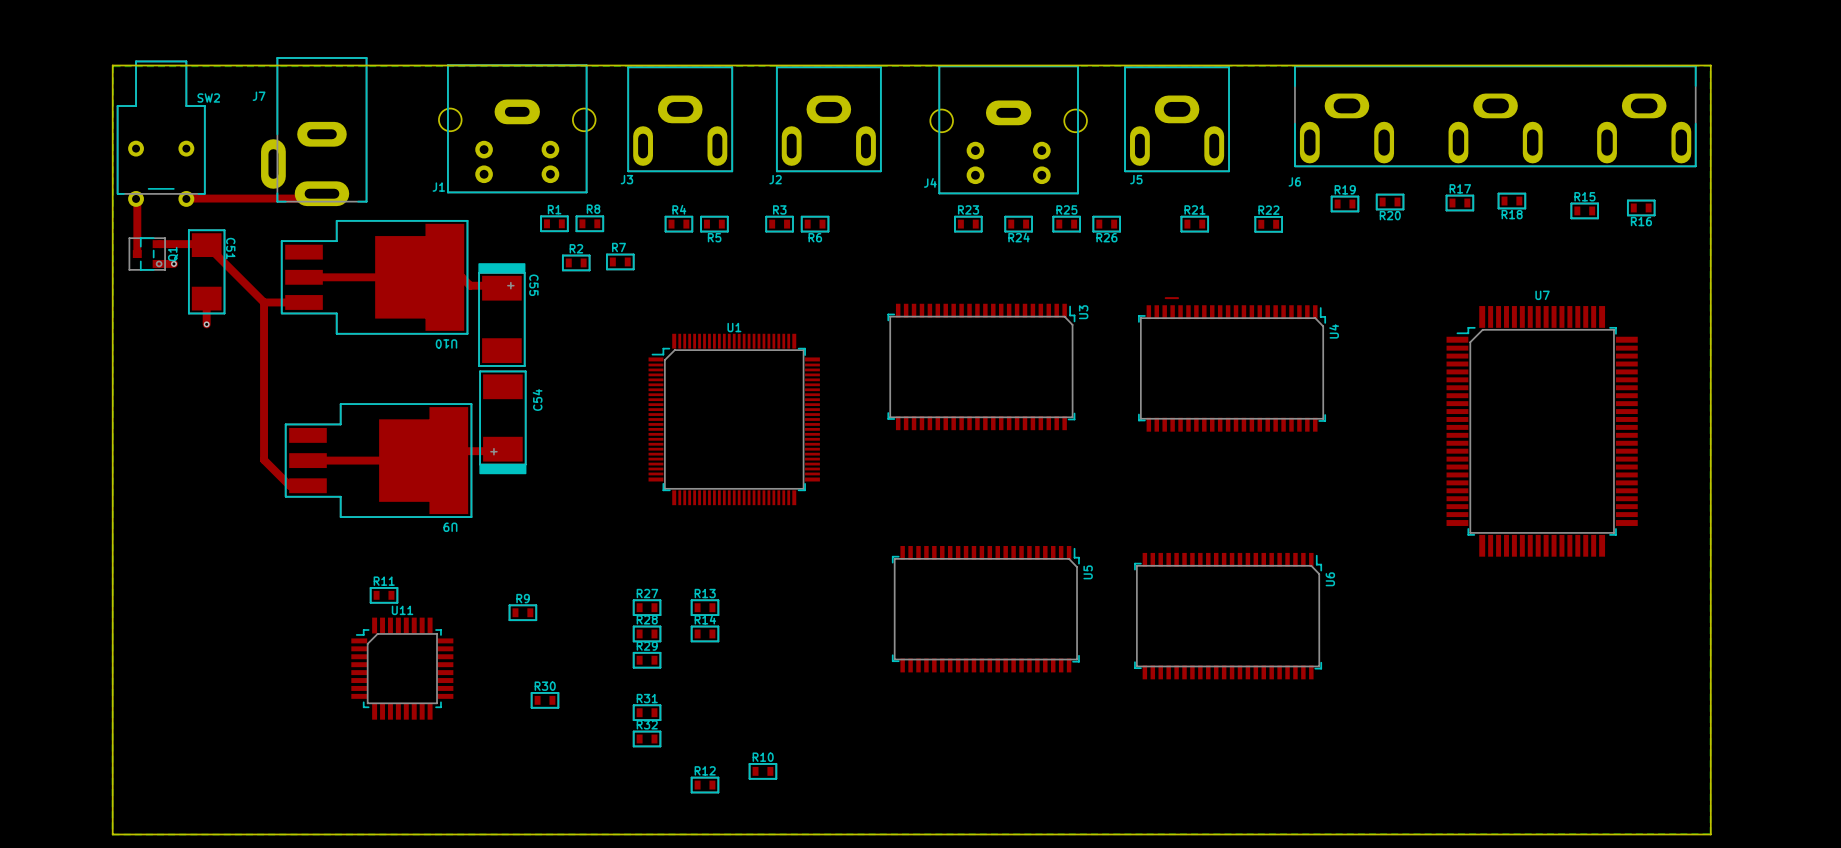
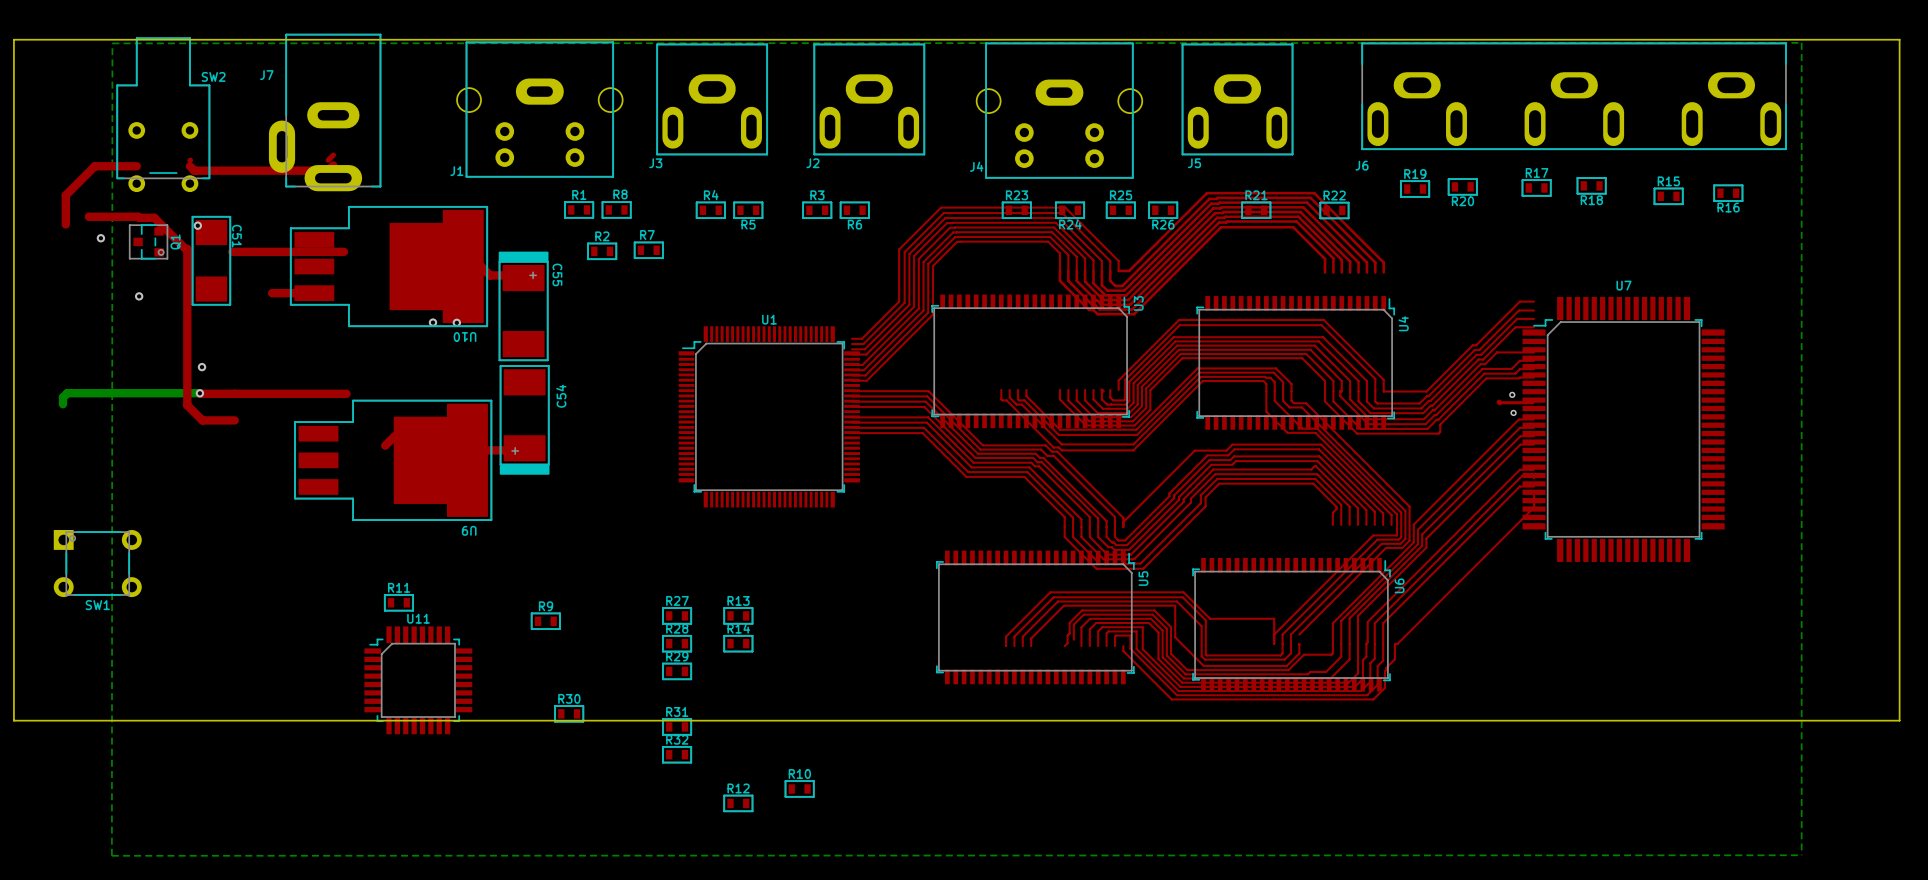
board edge: (112, 65) (1710, 65) (1710, 834) (112, 834) (112, 65) -> (13, 39) (13, 720) (1899, 720) (1899, 39) (13, 39)
top track: none -> (333, 155) (328, 160)
top track: none -> (190, 160) (189, 160)
top track: none -> (333, 165) (328, 170) (194, 170) (189, 166)
top track: none -> (136, 166) (94, 166) (65, 195) (65, 224)
top track: (321, 193) (317, 198) (186, 198) -> none
top track: (136, 198) (137, 251) -> none
top track: none -> (88, 216) (154, 217) (185, 248)
via: none -> (197, 225)
top track: (159, 244) (205, 244) (264, 302) (264, 459) (289, 485) (307, 485) -> none
via: none -> (100, 238)
top track: none -> (187, 248) (187, 405) (202, 420) (234, 420)
top track: (157, 263) (173, 263) -> none
via: (173, 263) -> none
top track: (304, 277) (409, 277) -> (232, 251) (343, 251)
top track: none -> (1325, 272) (1325, 258) (1293, 227) (1221, 227) (1134, 314) (1097, 314) (1093, 309) (1089, 309) (1059, 280) (1059, 253) (1048, 241) (957, 241) (932, 265) (932, 314) (866, 380) (852, 380)
top track: none -> (1333, 272) (1333, 258) (1296, 221) (1219, 222) (1132, 309) (1099, 309) (1092, 305) (1068, 280) (1068, 255) (1050, 236) (955, 237) (928, 264) (928, 312) (865, 375) (852, 375)
top track: none -> (1341, 272) (1341, 260) (1298, 216) (1217, 217) (1130, 304) (1101, 304) (1076, 280) (1076, 256) (1052, 232) (953, 232) (923, 262) (923, 310) (863, 370) (852, 370)
top track: none -> (1350, 272) (1350, 261) (1300, 212) (1223, 212) (1215, 213) (1128, 300) (1103, 300) (1085, 281) (1085, 258) (1054, 227) (949, 227) (918, 258) (918, 308) (862, 365) (852, 365)
top track: none -> (1358, 272) (1358, 262) (1303, 207) (1213, 208) (1126, 295) (1105, 295) (1093, 283) (1093, 260) (1056, 222) (947, 223) (914, 256) (914, 306) (866, 354) (852, 354)
top track: none -> (1366, 272) (1366, 262) (1307, 202) (1211, 203) (1124, 290) (1107, 290) (1101, 285) (1101, 260) (1058, 218) (945, 218) (909, 254) (909, 304) (864, 349) (852, 349)
top track: none -> (1375, 272) (1375, 262) (1310, 197) (1209, 198) (1122, 285) (1115, 285) (1110, 280) (1110, 260) (1062, 213) (943, 213) (904, 252) (904, 302) (863, 344) (852, 344)
top track: none -> (1383, 272) (1383, 262) (1314, 193) (1206, 193) (1129, 270) (1118, 270) (1118, 260) (1065, 207) (941, 207) (899, 249) (899, 301) (862, 338) (852, 338)
top track: (206, 298) (206, 324) -> none
top track: (1165, 298) (1178, 298) -> none
via: none -> (139, 296)
top track: none -> (1534, 301) (1519, 301) (1426, 391) (1383, 391) (1383, 379) (1323, 319) (1179, 319) (1118, 380) (1118, 389)
top track: none -> (1534, 310) (1518, 310) (1479, 350) (1474, 350) (1419, 403) (1377, 403) (1375, 401) (1375, 378) (1321, 325) (1179, 325) (1125, 379) (1124, 400) (1113, 400) (1110, 397) (1110, 389)
via: (206, 324) -> none
top track: none -> (1534, 318) (1517, 318) (1481, 354) (1476, 354) (1421, 408) (1373, 408) (1366, 401) (1366, 381) (1323, 337) (1173, 337) (1129, 381) (1129, 401) (1125, 404) (1107, 404) (1101, 399) (1101, 389) (1103, 391)
via: none -> (432, 322)
via: none -> (456, 322)
top track: none -> (1534, 327) (1515, 327) (1483, 359) (1478, 359) (1423, 413) (1370, 413) (1358, 401) (1358, 381) (1318, 341) (1175, 341) (1133, 383) (1133, 402) (1127, 408) (1102, 408) (1093, 399) (1093, 389)
top track: none -> (1534, 352) (1496, 352) (1485, 364) (1480, 364) (1423, 419) (1369, 419) (1350, 399) (1350, 381) (1314, 345) (1177, 345) (1137, 385) (1137, 404) (1129, 412) (1097, 412) (1085, 400) (1085, 389)
top track: none -> (1534, 360) (1519, 360) (1511, 368) (1482, 368) (1425, 424) (1368, 424) (1340, 396) (1341, 381) (1310, 349) (1178, 349) (1141, 386) (1141, 406) (1131, 417) (1093, 417) (1076, 400) (1076, 389)
via: none -> (202, 367)
top track: none -> (1534, 369) (1519, 369) (1515, 373) (1484, 373) (1427, 428) (1360, 428) (1333, 401) (1333, 381) (1306, 354) (1180, 354) (1146, 388) (1146, 408) (1132, 421) (1104, 421)
top track: none -> (1534, 377) (1486, 378) (1440, 424) (1438, 433) (1357, 433) (1325, 401) (1325, 381) (1302, 358) (1182, 358) (1150, 390) (1150, 409) (1134, 425) (1086, 425) (1059, 399) (1059, 389)
top track: none -> (1001, 389) (1001, 399) (1006, 400) (1053, 447) (1058, 447) (1061, 450) (1133, 450) (1202, 381) (1263, 381) (1266, 383) (1266, 411) (1287, 432) (1315, 432) (1397, 514) (1397, 535) (1373, 535) (1274, 634)
top track: none -> (1009, 389) (1009, 397) (1016, 404) (1021, 404) (1061, 444) (1133, 444) (1201, 376) (1270, 377) (1274, 382) (1274, 400) (1302, 428) (1317, 428) (1401, 512) (1401, 537) (1398, 539) (1377, 539) (1282, 634) (1282, 653) (1280, 655) (1206, 655) (1205, 620) (1182, 597) (1053, 597) (1014, 636) (1014, 646)
top track: none -> (1018, 389) (1018, 399) (1024, 400) (1058, 434) (1137, 434) (1199, 372) (1273, 372) (1283, 382) (1283, 400) (1289, 407) (1301, 407) (1405, 510) (1405, 538) (1400, 543) (1381, 543) (1290, 634) (1290, 653) (1284, 659) (1204, 659) (1201, 656) (1201, 626) (1176, 601) (1057, 601) (1022, 636) (1022, 646)
top track: none -> (1026, 389) (1026, 396) (1060, 429) (1136, 429) (1197, 368) (1276, 368) (1291, 383) (1291, 400) (1293, 403) (1306, 403) (1409, 506) (1409, 540) (1402, 548) (1385, 548) (1299, 634)
top track: none -> (1068, 389) (1068, 400) (1089, 421) (1104, 421)
top track: none -> (852, 391) (928, 391) (982, 445) (1045, 445) (1051, 451) (1057, 451) (1123, 517) (1123, 527)
top track: none -> (199, 393) (346, 393)
bottom track: none -> (199, 393) (67, 393) (62, 397) (62, 404)
via: none -> (199, 393)
via: none -> (1512, 394)
top track: none -> (852, 396) (927, 396) (980, 449) (1041, 449) (1047, 455) (1053, 455) (1114, 517) (1114, 537) (1118, 540) (1125, 540) (1207, 455) (1228, 455) (1234, 449) (1319, 449) (1383, 513) (1383, 524)
top track: none -> (852, 401) (925, 401) (977, 453) (1035, 453) (1039, 457) (1043, 457) (1106, 521) (1106, 537) (1116, 545) (1127, 545) (1209, 460) (1230, 460) (1234, 456) (1319, 456) (1374, 511) (1374, 524)
top track: none -> (1499, 402) (1532, 402)
top track: none -> (852, 406) (924, 406) (975, 457) (1033, 457) (1037, 462) (1041, 462) (1098, 518) (1098, 537) (1108, 547) (1114, 549) (1129, 549) (1211, 464) (1232, 464) (1235, 461) (1317, 461) (1366, 510) (1366, 524)
via: none -> (1513, 412)
top track: none -> (852, 417) (928, 417) (973, 462) (1031, 462) (1035, 466) (1039, 466) (1089, 517) (1089, 537) (1107, 554) (1130, 554) (1213, 469) (1311, 469) (1315, 466) (1358, 508) (1358, 524)
top track: none -> (1534, 419) (1518, 419) (1413, 524) (1413, 542) (1332, 623) (1331, 654) (1303, 654) (1288, 670) (1187, 670) (1171, 653) (1171, 627) (1154, 610) (1082, 610) (1069, 622) (1069, 633) (1067, 635) (1067, 643) (1064, 646)
top track: none -> (852, 422) (926, 422) (971, 467) (1029, 467) (1081, 519) (1081, 537) (1103, 559) (1134, 558) (1190, 502) (1190, 498) (1215, 474) (1317, 474) (1349, 506) (1349, 524)
top track: none -> (852, 427) (924, 427) (968, 472) (1027, 472) (1073, 517) (1073, 537) (1100, 564) (1140, 563) (1200, 503) (1200, 495) (1217, 478) (1315, 478) (1341, 504) (1341, 524)
top track: none -> (1534, 427) (1519, 427) (1417, 529) (1417, 544) (1341, 620) (1341, 656) (1326, 671) (1310, 671) (1308, 674) (1185, 674) (1166, 655) (1166, 628) (1152, 614) (1083, 614) (1073, 624) (1073, 639)
top track: none -> (852, 433) (922, 433) (966, 476) (1024, 476) (1064, 517) (1064, 537) (1096, 568) (1143, 568) (1205, 506) (1205, 497) (1219, 483) (1313, 483) (1336, 506) (1332, 512) (1332, 524)
top track: none -> (395, 435) (385, 445)
top track: none -> (1534, 436) (1520, 436) (1422, 534) (1422, 545) (1349, 618) (1349, 659) (1330, 678) (1183, 678) (1162, 657) (1162, 630) (1150, 618) (1089, 618) (1081, 627) (1081, 646)
top track: none -> (1534, 444) (1520, 444) (1426, 538) (1426, 547) (1358, 615) (1358, 673) (1348, 682) (1182, 682) (1158, 658) (1158, 632) (1148, 623) (1096, 623) (1089, 629) (1089, 646)
top track: (307, 460) (413, 460) -> none
top track: none -> (1534, 469) (1519, 469) (1367, 621) (1367, 642) (1366, 656) (1362, 660) (1362, 678) (1354, 686) (1180, 686) (1142, 649) (1142, 627) (1102, 627) (1098, 631) (1098, 646)
top track: none -> (1534, 478) (1536, 475) (1522, 475) (1374, 623) (1374, 658) (1370, 663) (1370, 681) (1361, 691) (1178, 691) (1136, 649) (1136, 631) (1108, 631) (1106, 633) (1106, 646)
top track: none -> (1534, 486) (1519, 486) (1383, 623) (1383, 660) (1377, 666) (1377, 684) (1367, 695) (1176, 695) (1130, 648) (1130, 635) (1116, 635) (1114, 646)
top track: none -> (1534, 495) (1534, 507) (1397, 643) (1394, 643) (1394, 659) (1384, 671) (1384, 687) (1373, 699) (1171, 699) (1123, 651) (1123, 646)
top track: none -> (1123, 522) (1194, 450) (1226, 450) (1232, 444) (1321, 444) (1391, 515) (1391, 524)
SW1: none -> (97, 563)
top track: none -> (1274, 643) (1274, 618) (1210, 618) (1183, 592) (1050, 592) (1006, 636) (1006, 646)
top track: none -> (1299, 643) (1299, 653) (1286, 665) (1203, 665) (1175, 637) (1175, 605) (1063, 605) (1031, 638) (1031, 646)

